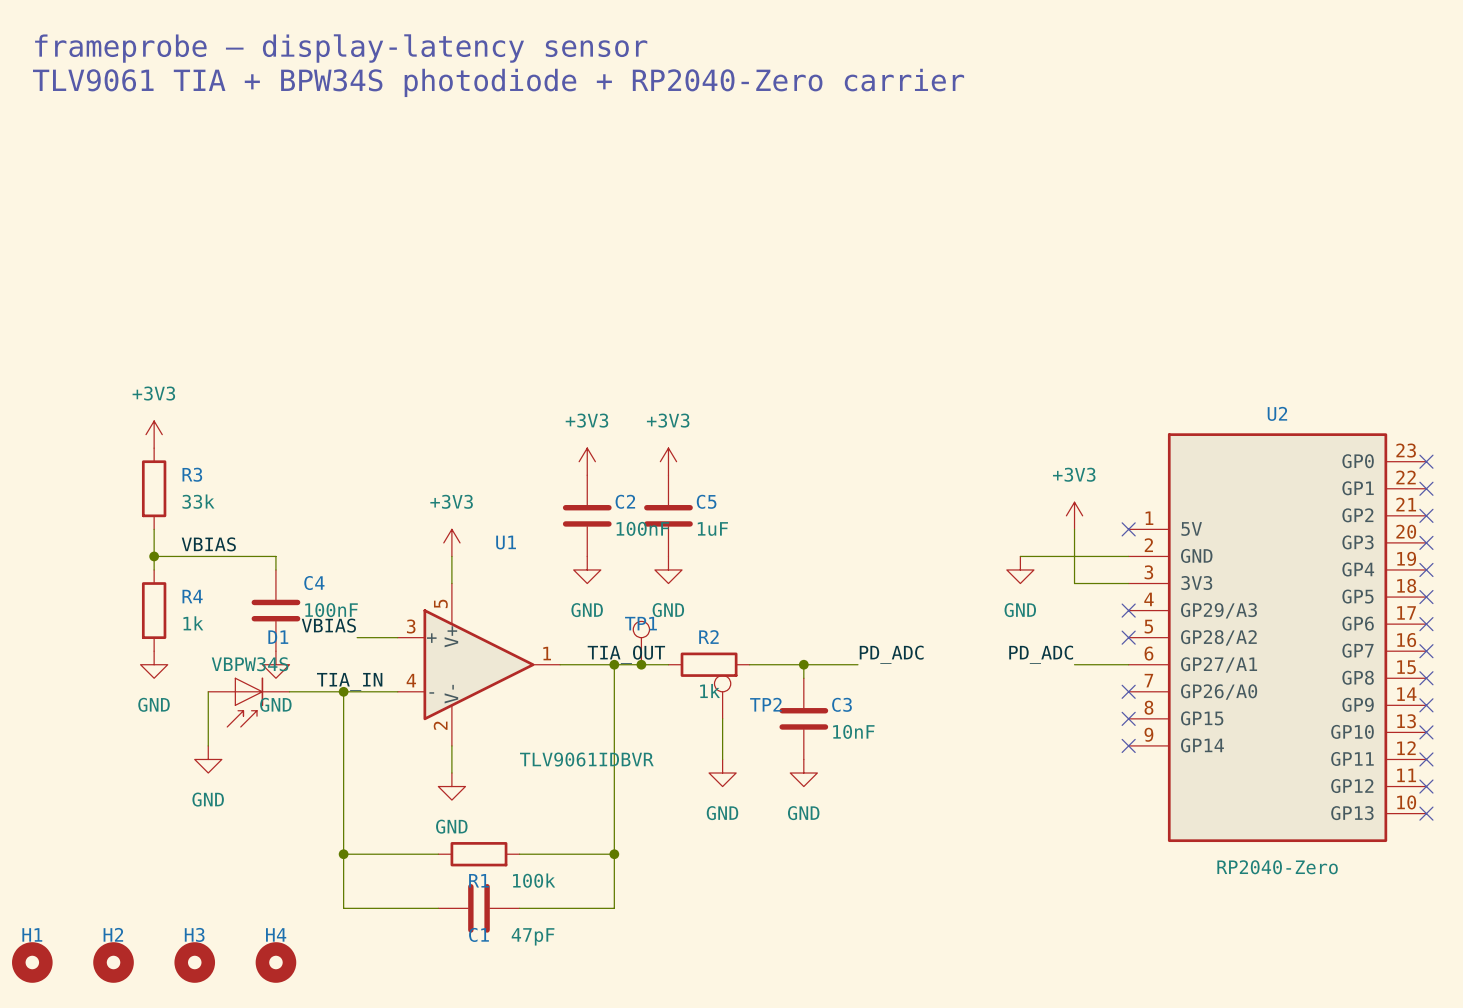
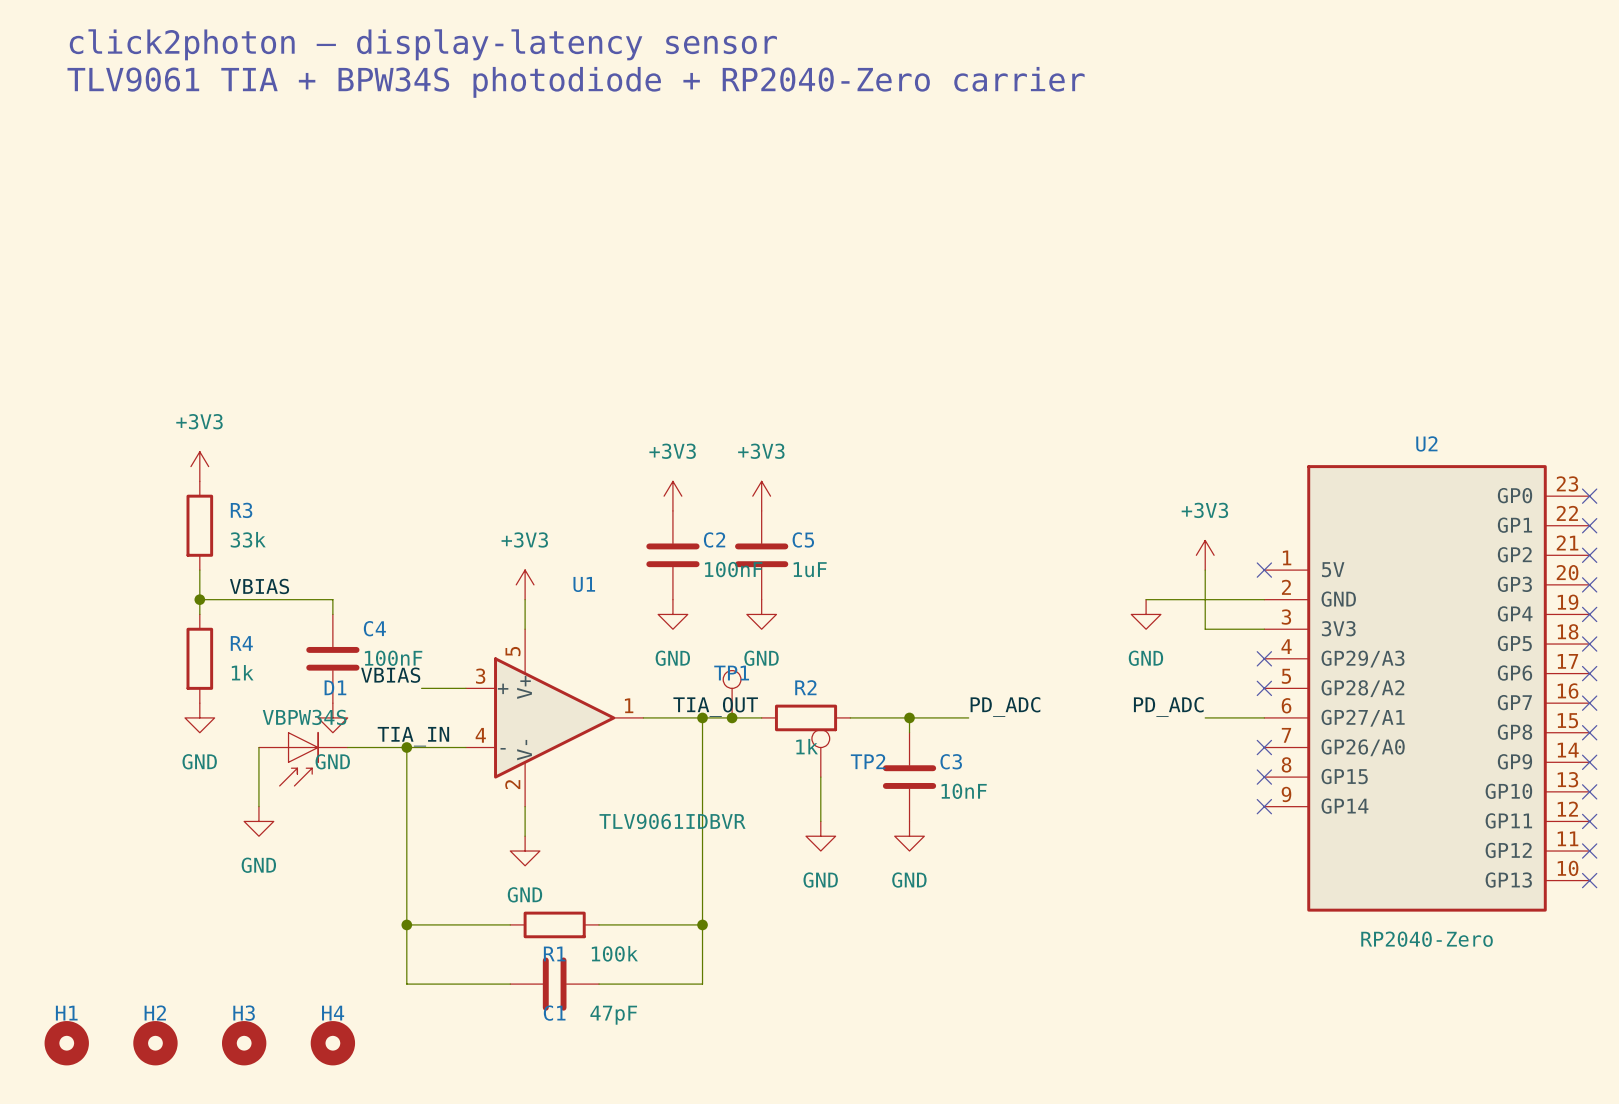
text: frameprobe — display-latency sensor (341, 48) -> click2photon — display-latency sensor (423, 44)

